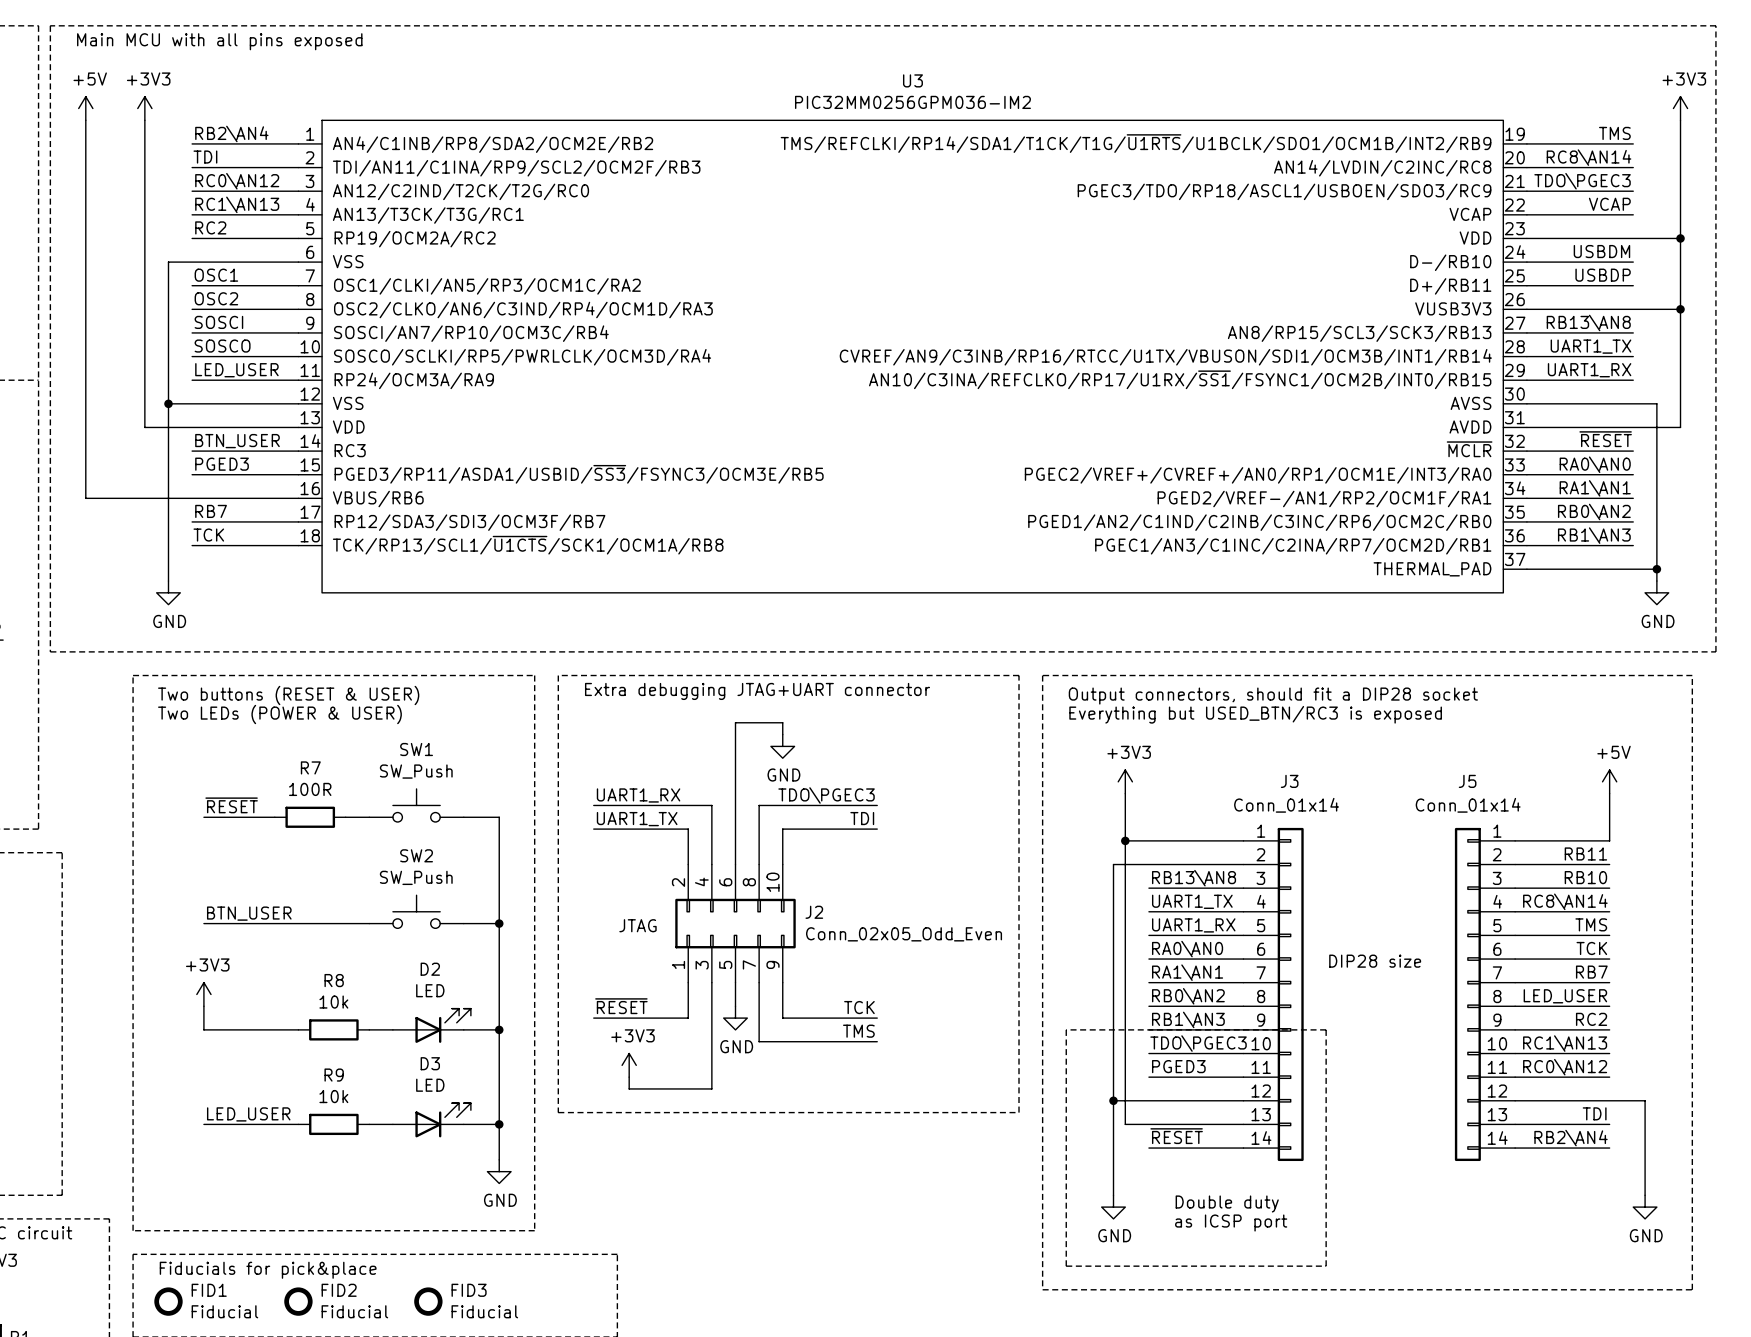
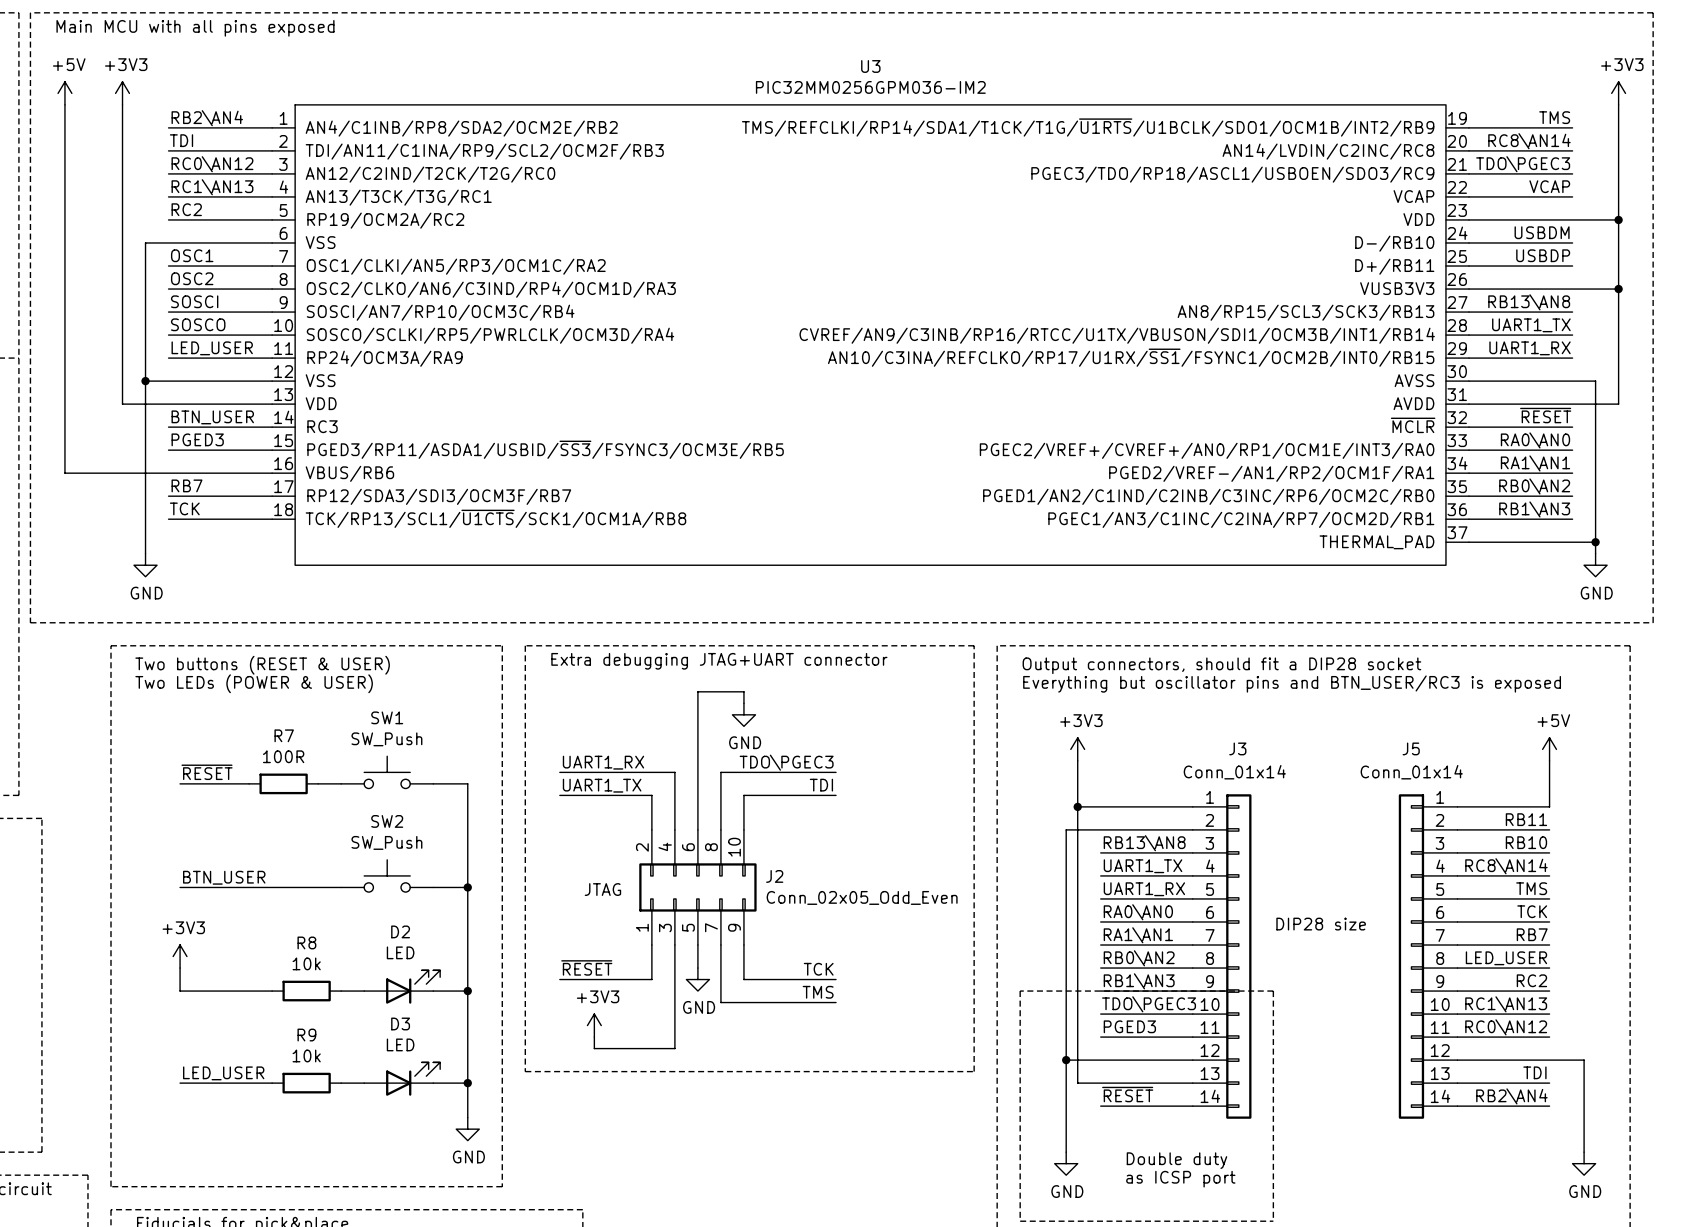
text: Everything but USED_BTN/RC3 is exposed (1255, 714) -> Everything but oscillator pins and BTN_USER/RC3 is exposed (1292, 684)

